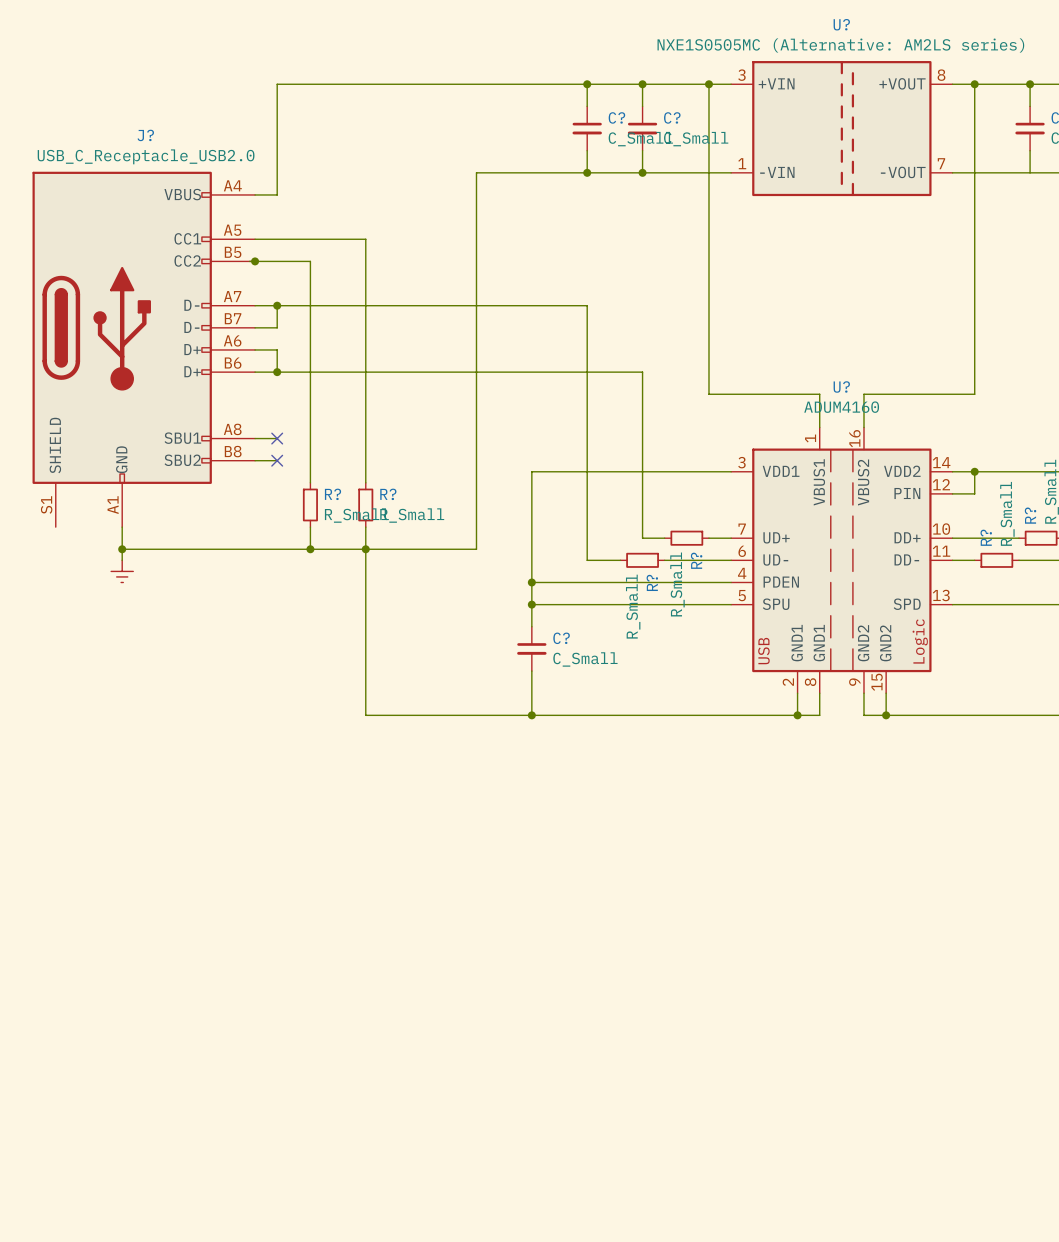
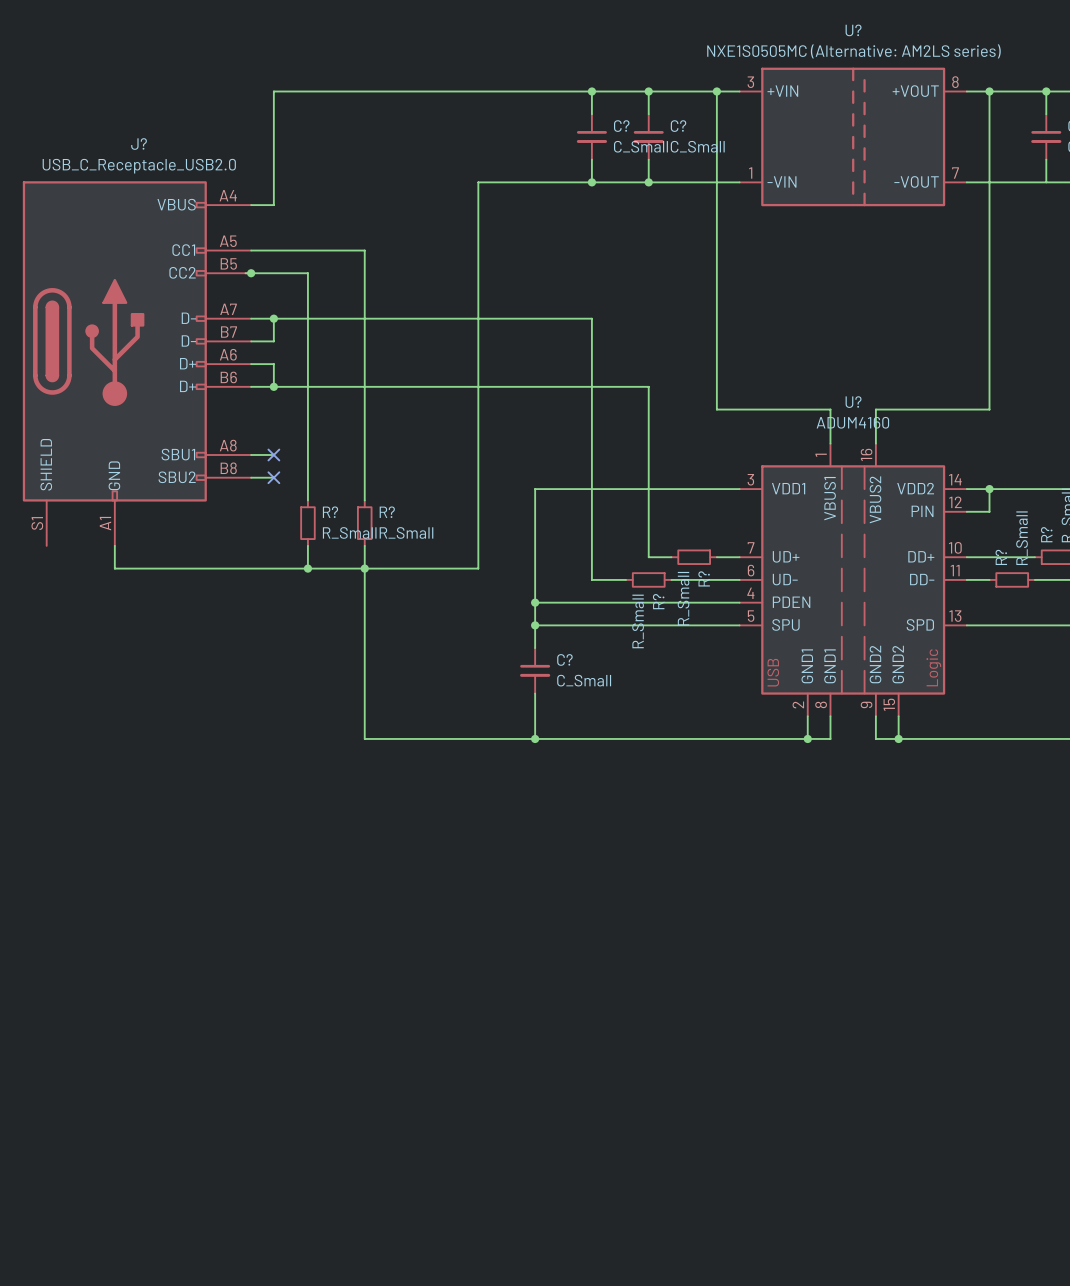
wire: (122, 549) (122, 560) -> none
junction: (122, 549) -> none
power symbol: (122, 571) -> none

